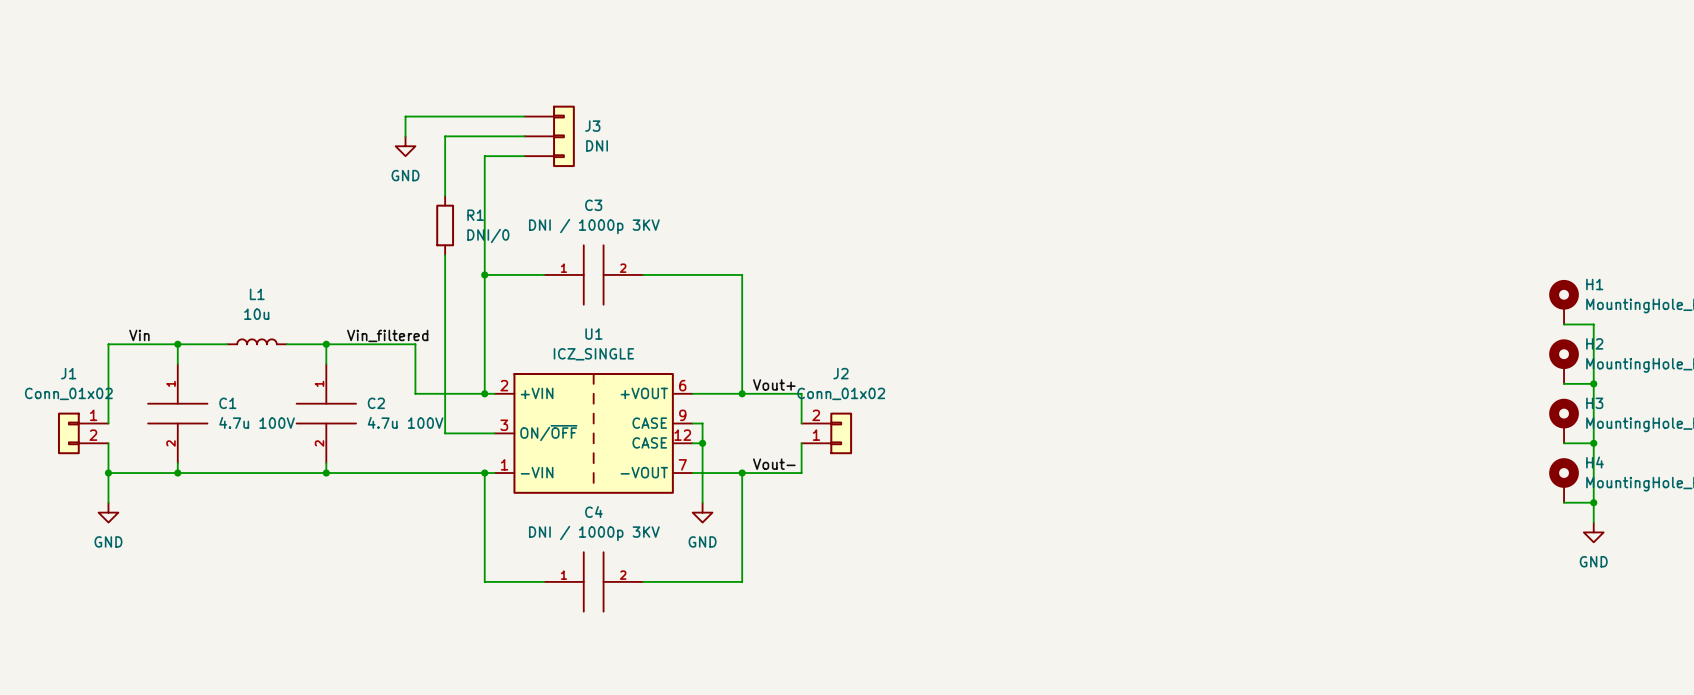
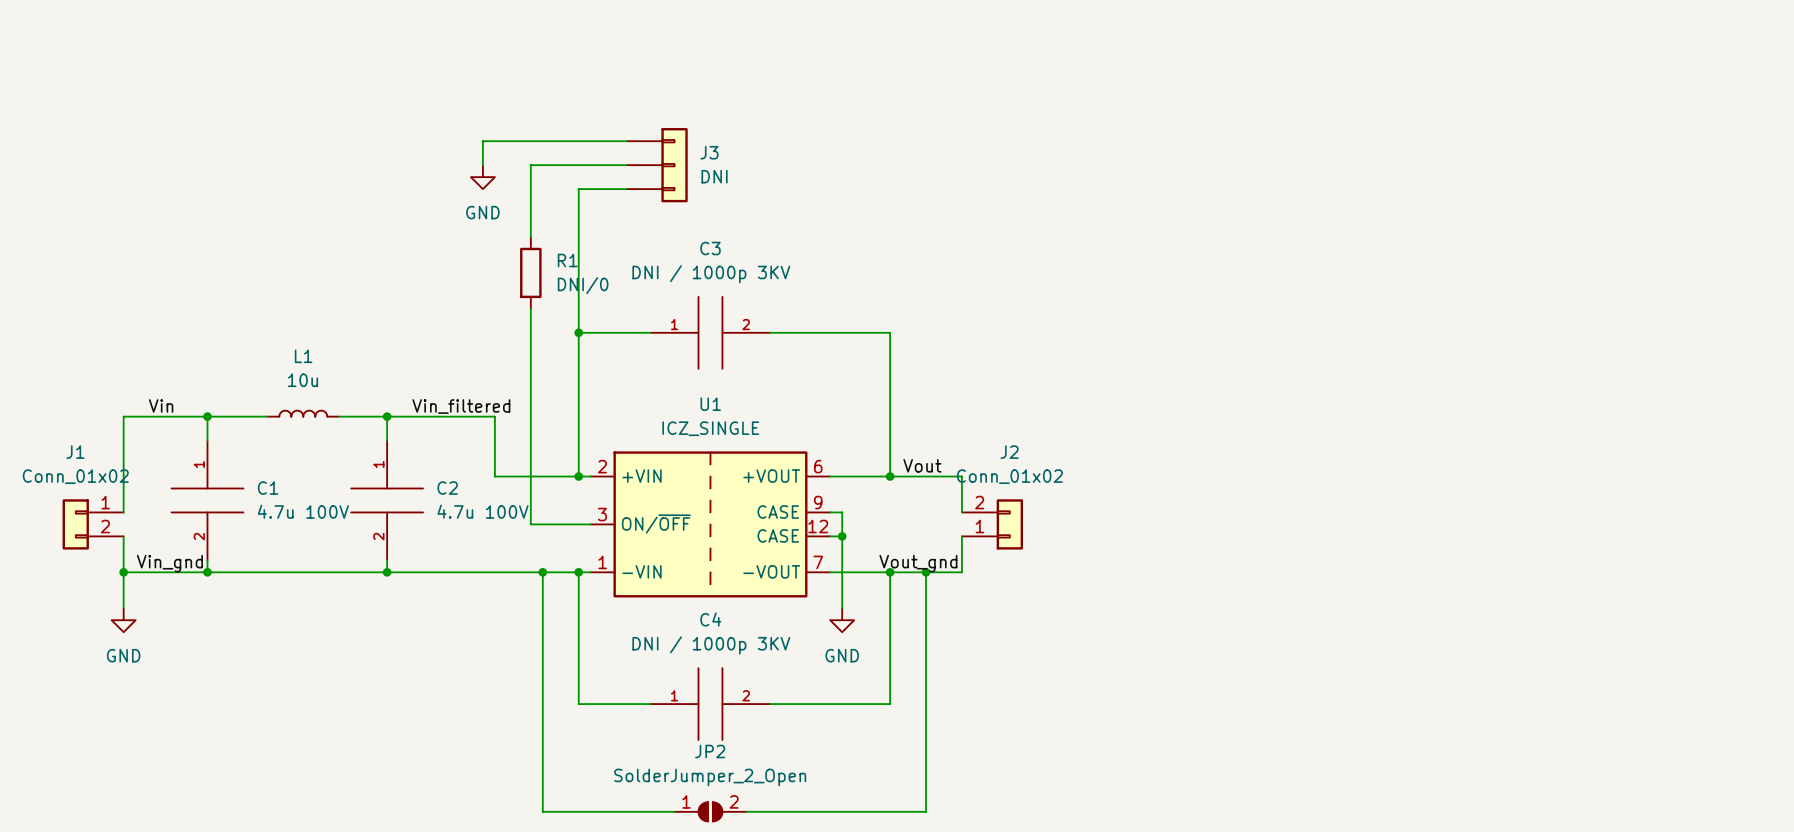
label: Vout+ (774, 384) -> Vout (922, 465)
label: Vout- (774, 464) -> Vout_gnd (918, 563)
label: none -> Vin_gnd (169, 563)
wire: none -> (542, 572) (542, 811) (674, 811)
junction: none -> (542, 572)
wire: none -> (926, 572) (926, 811) (746, 811)
junction: none -> (926, 572)
JP2: none -> SolderJumper_2_Open (710, 811)

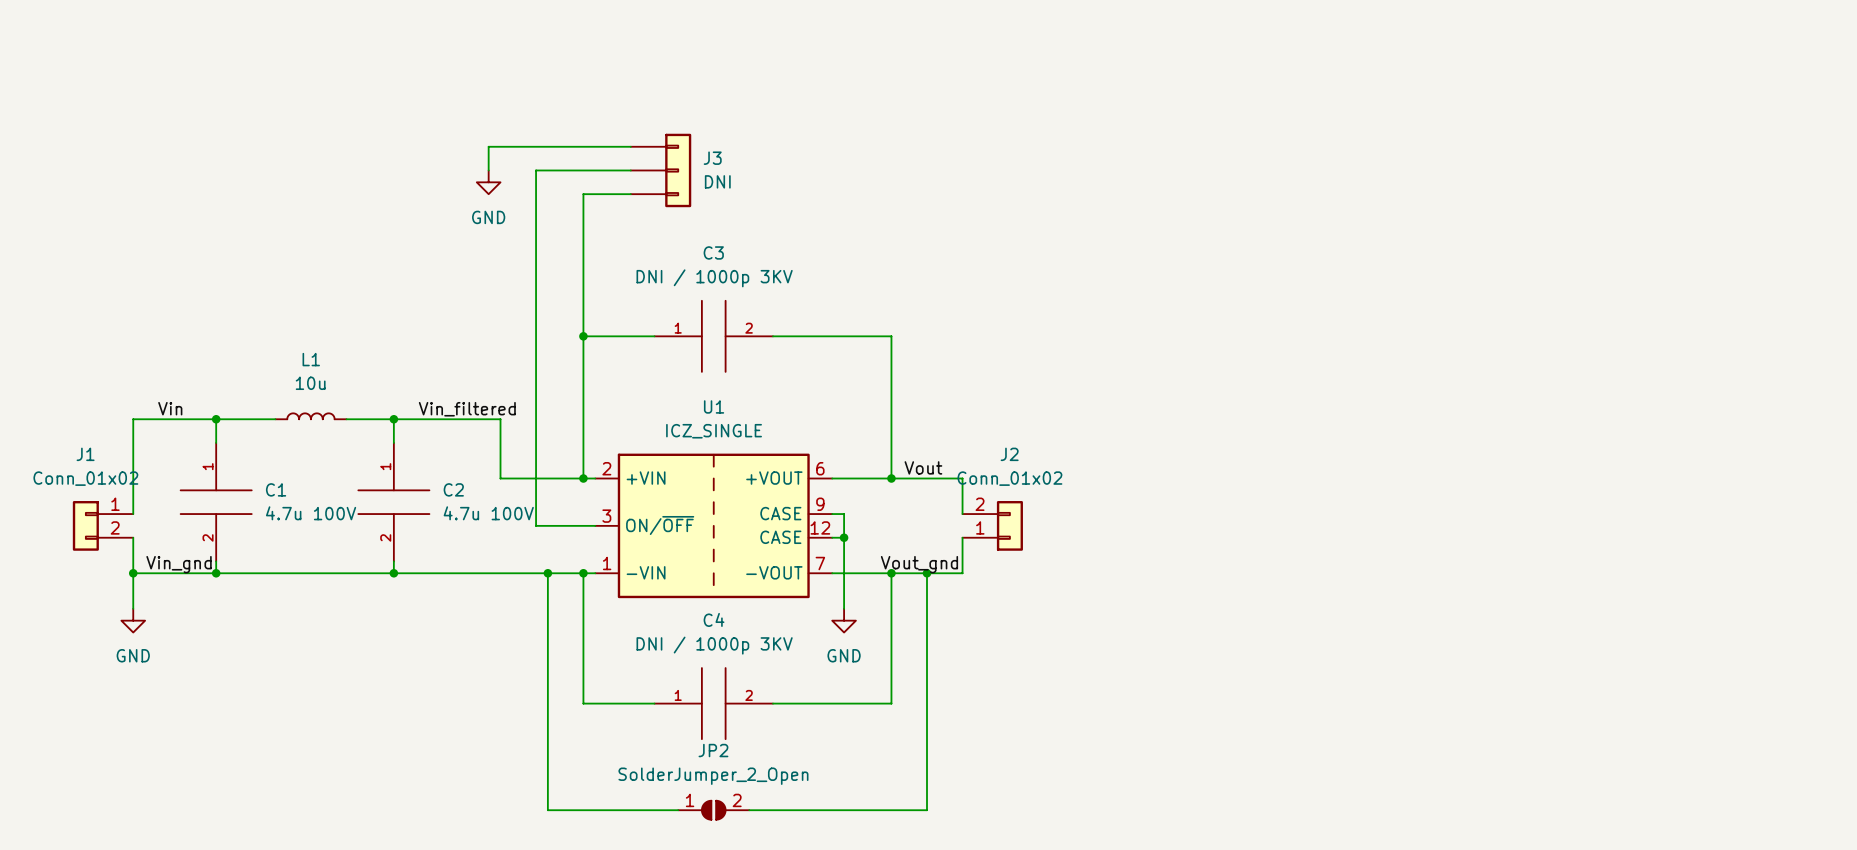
wire: none -> (536, 241) (536, 312)
R1: DNI/0 (530, 272) -> none

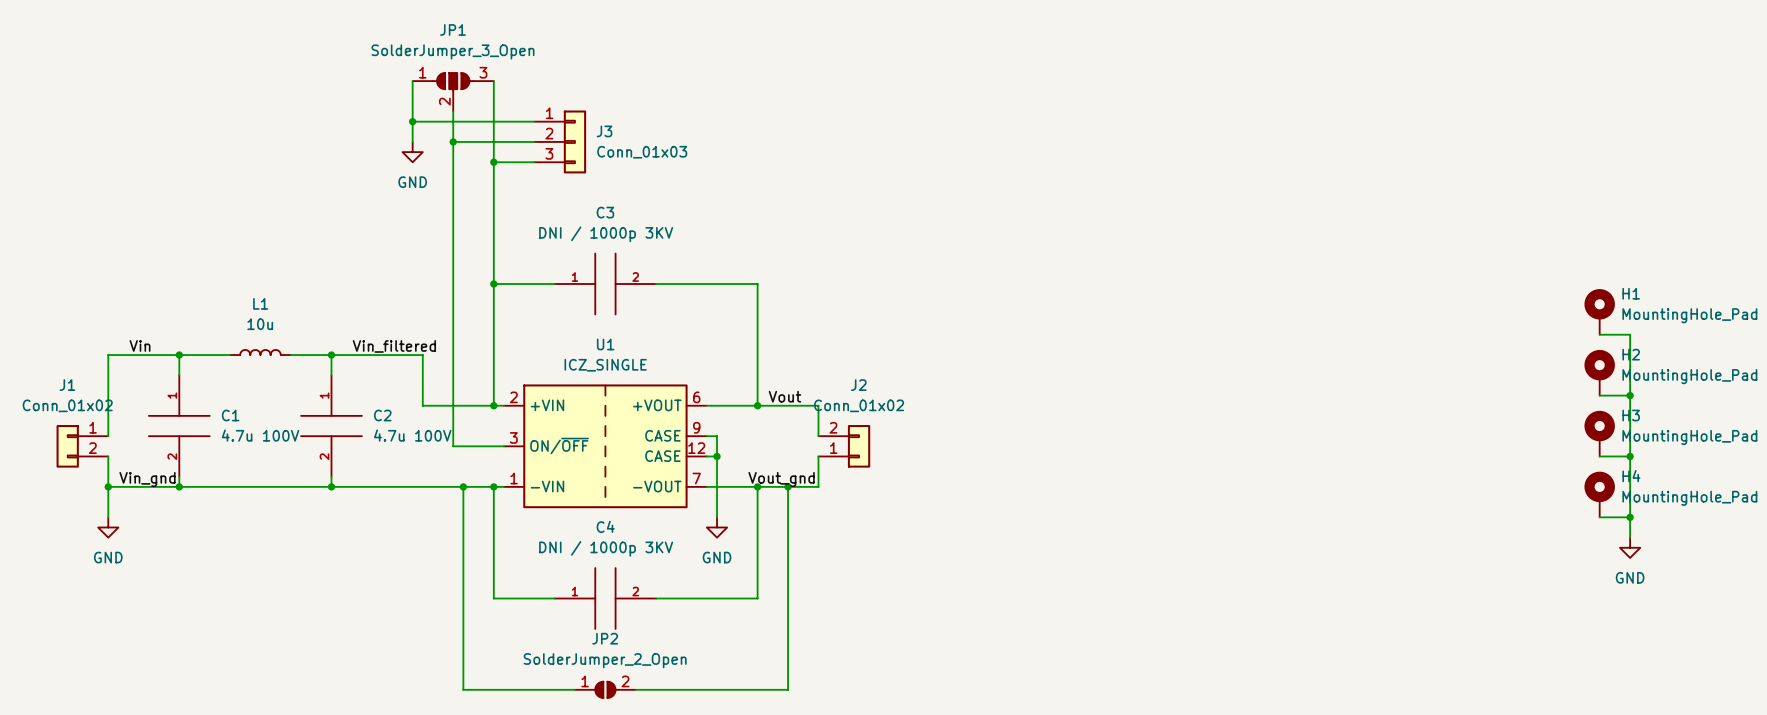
wire: none -> (412, 81) (412, 121)
wire: none -> (493, 81) (493, 162)
JP1: none -> SolderJumper_3_Open (453, 92)
wire: none -> (453, 111) (453, 141)
J3 pin number: none -> 1 (549, 113)
junction: none -> (412, 121)
J3 pin number: none -> 2 (549, 133)
junction: none -> (453, 141)
J3 value: DNI (717, 181) -> Conn_01x03 (642, 152)
J3 pin number: none -> 3 (549, 153)
junction: none -> (493, 162)

